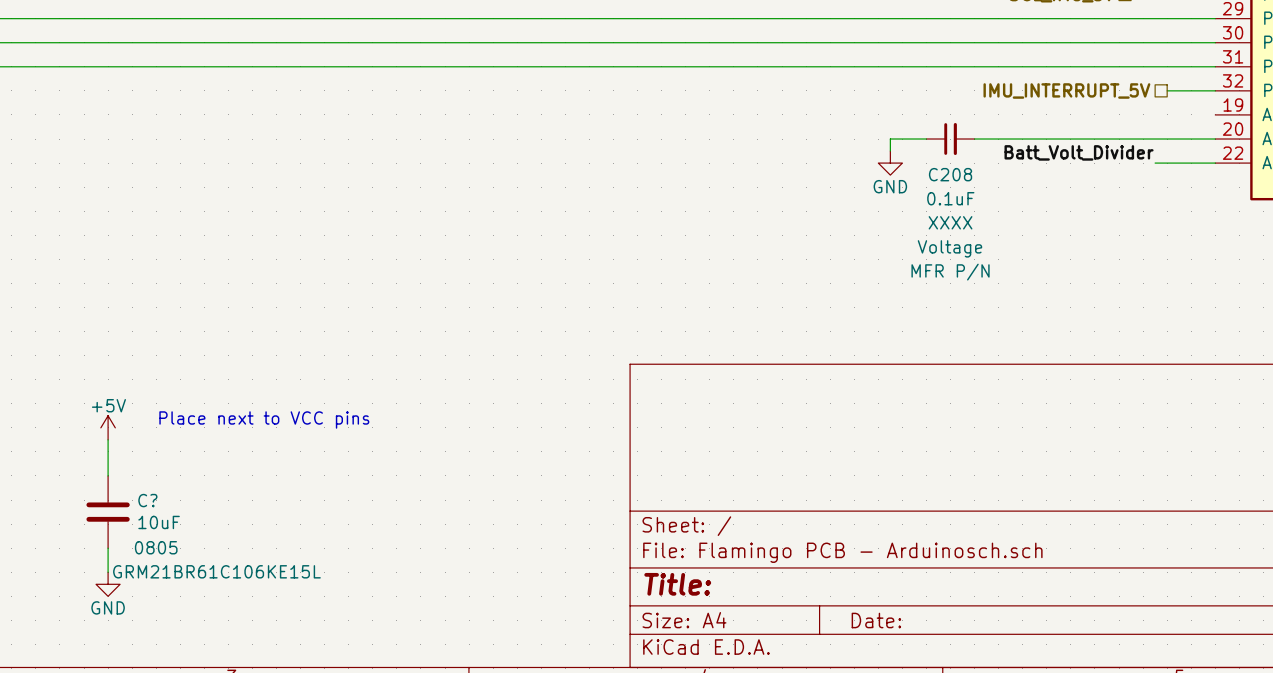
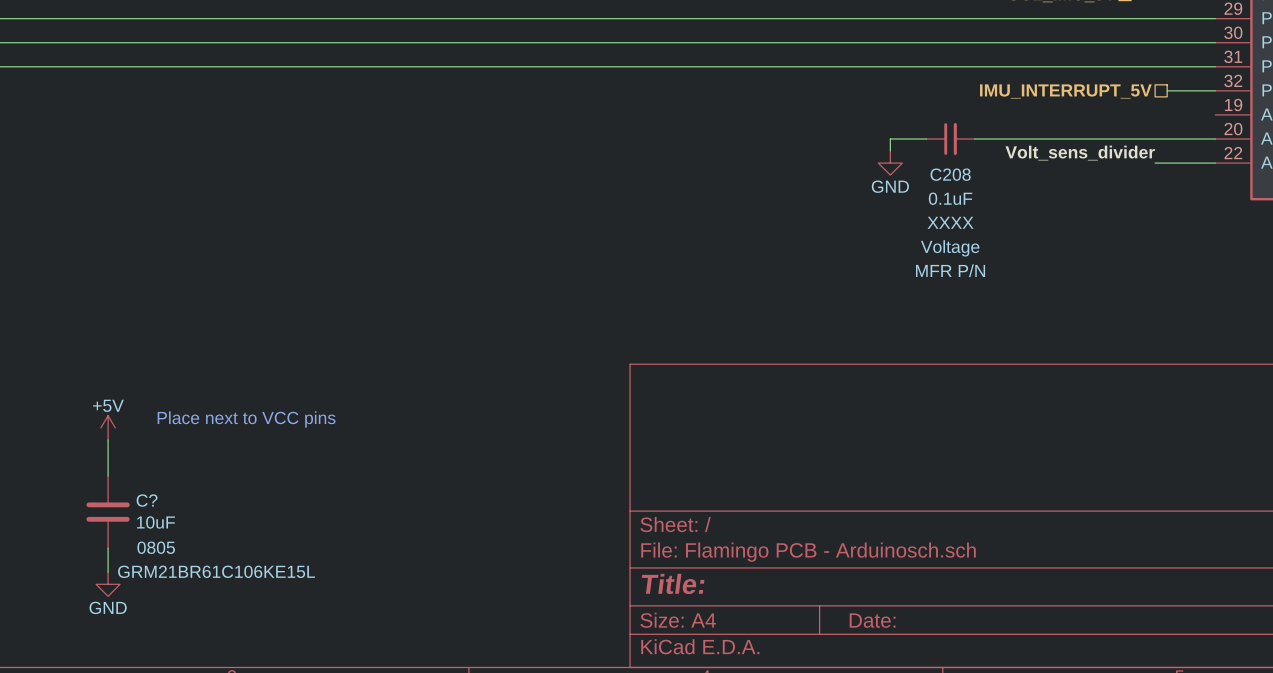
label: Batt_Volt_Divider (1079, 152) -> Volt_sens_divider (1080, 153)

